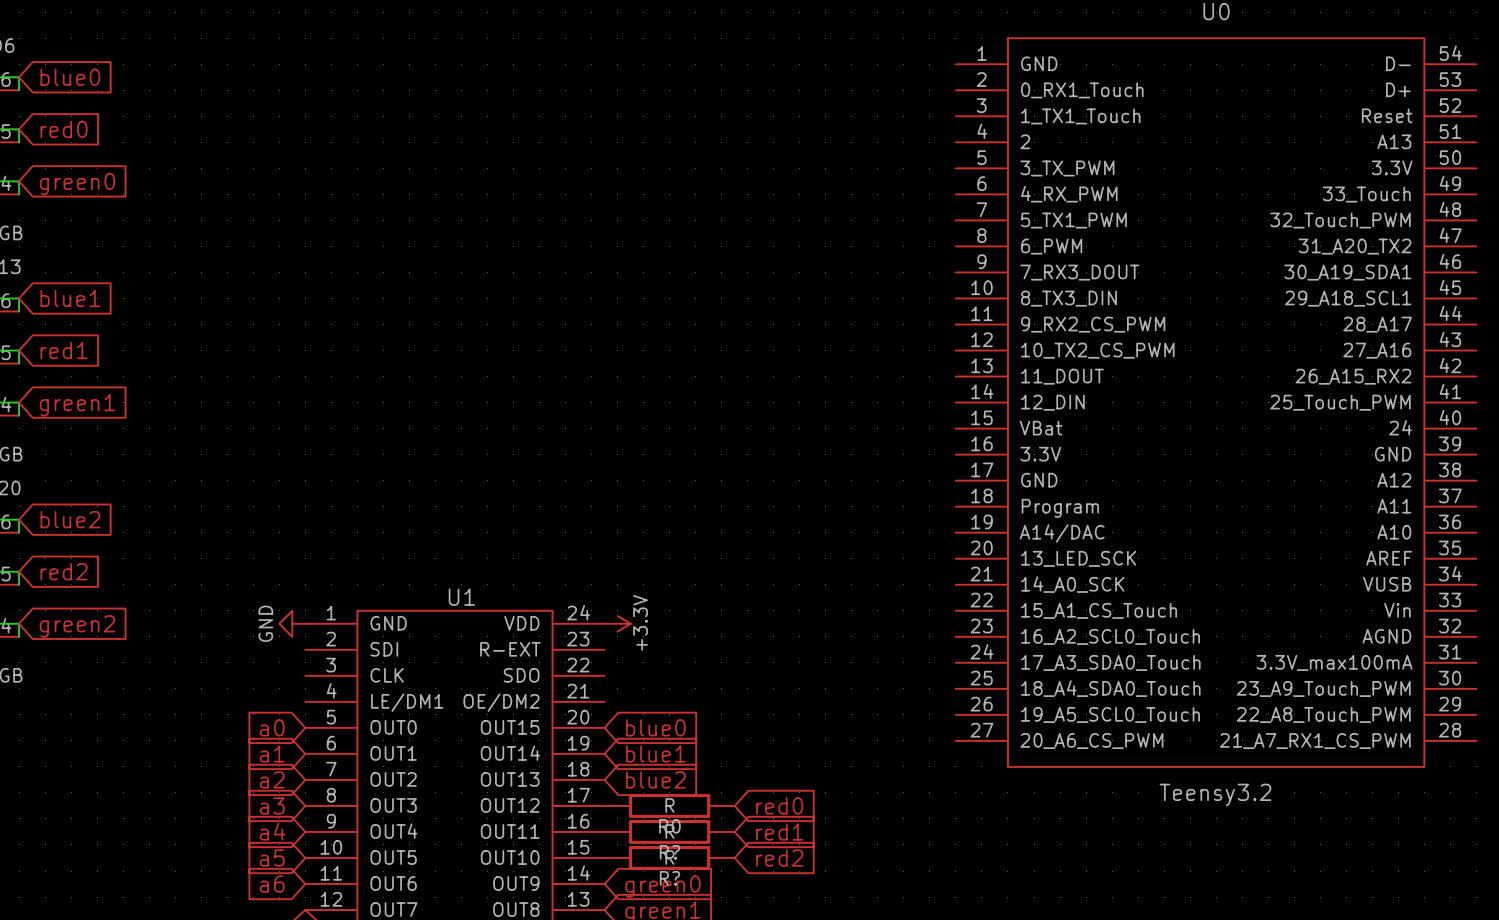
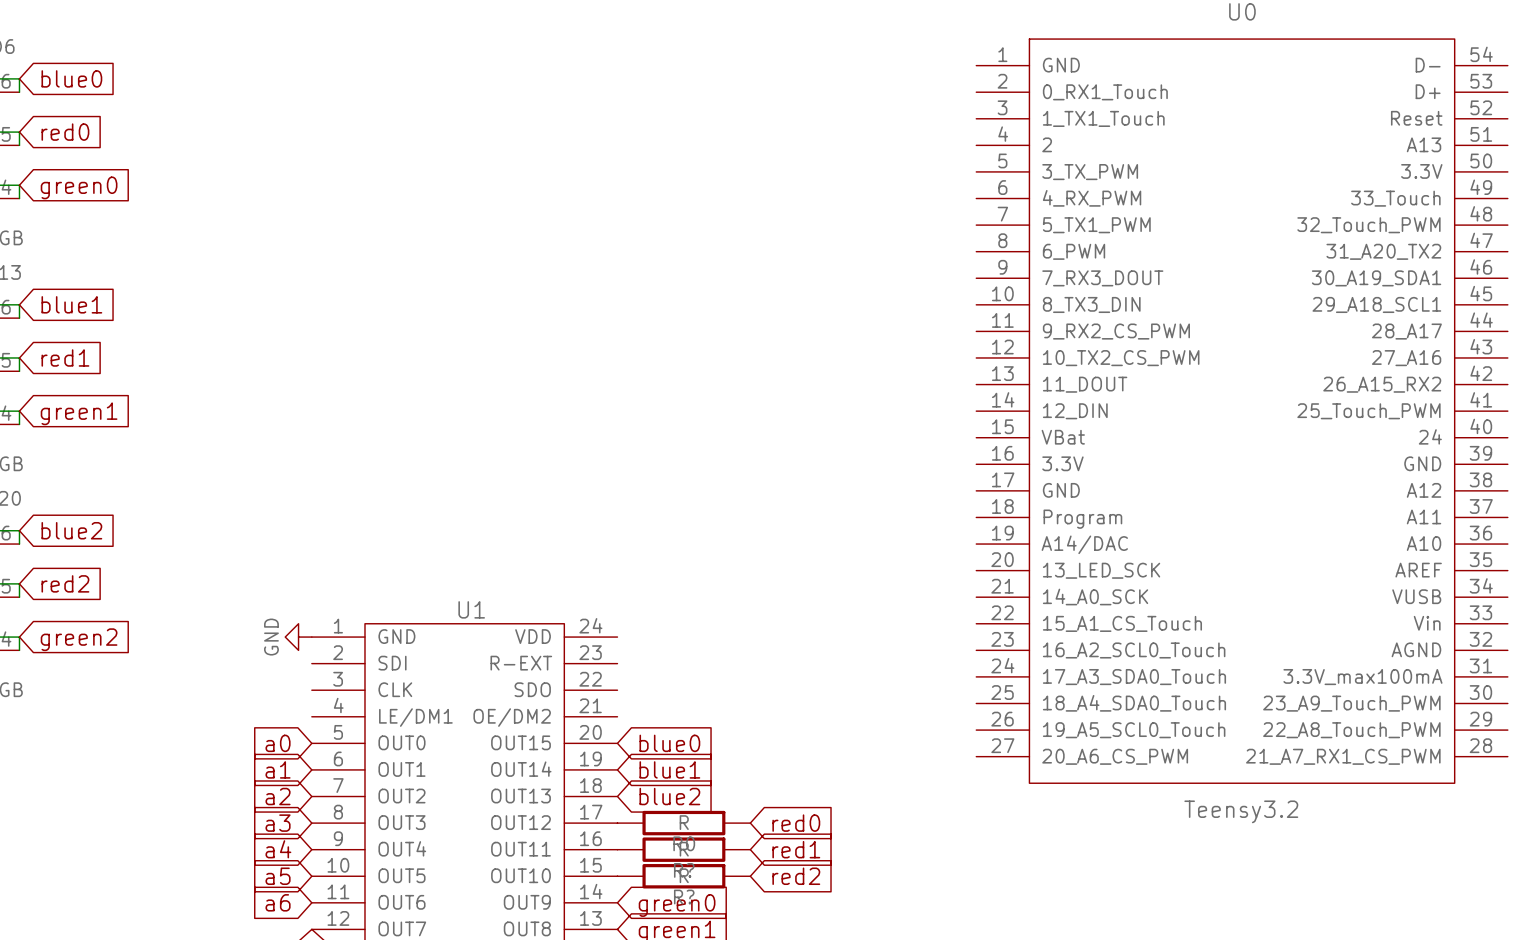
power symbol: +3.3V (617, 623) -> none

